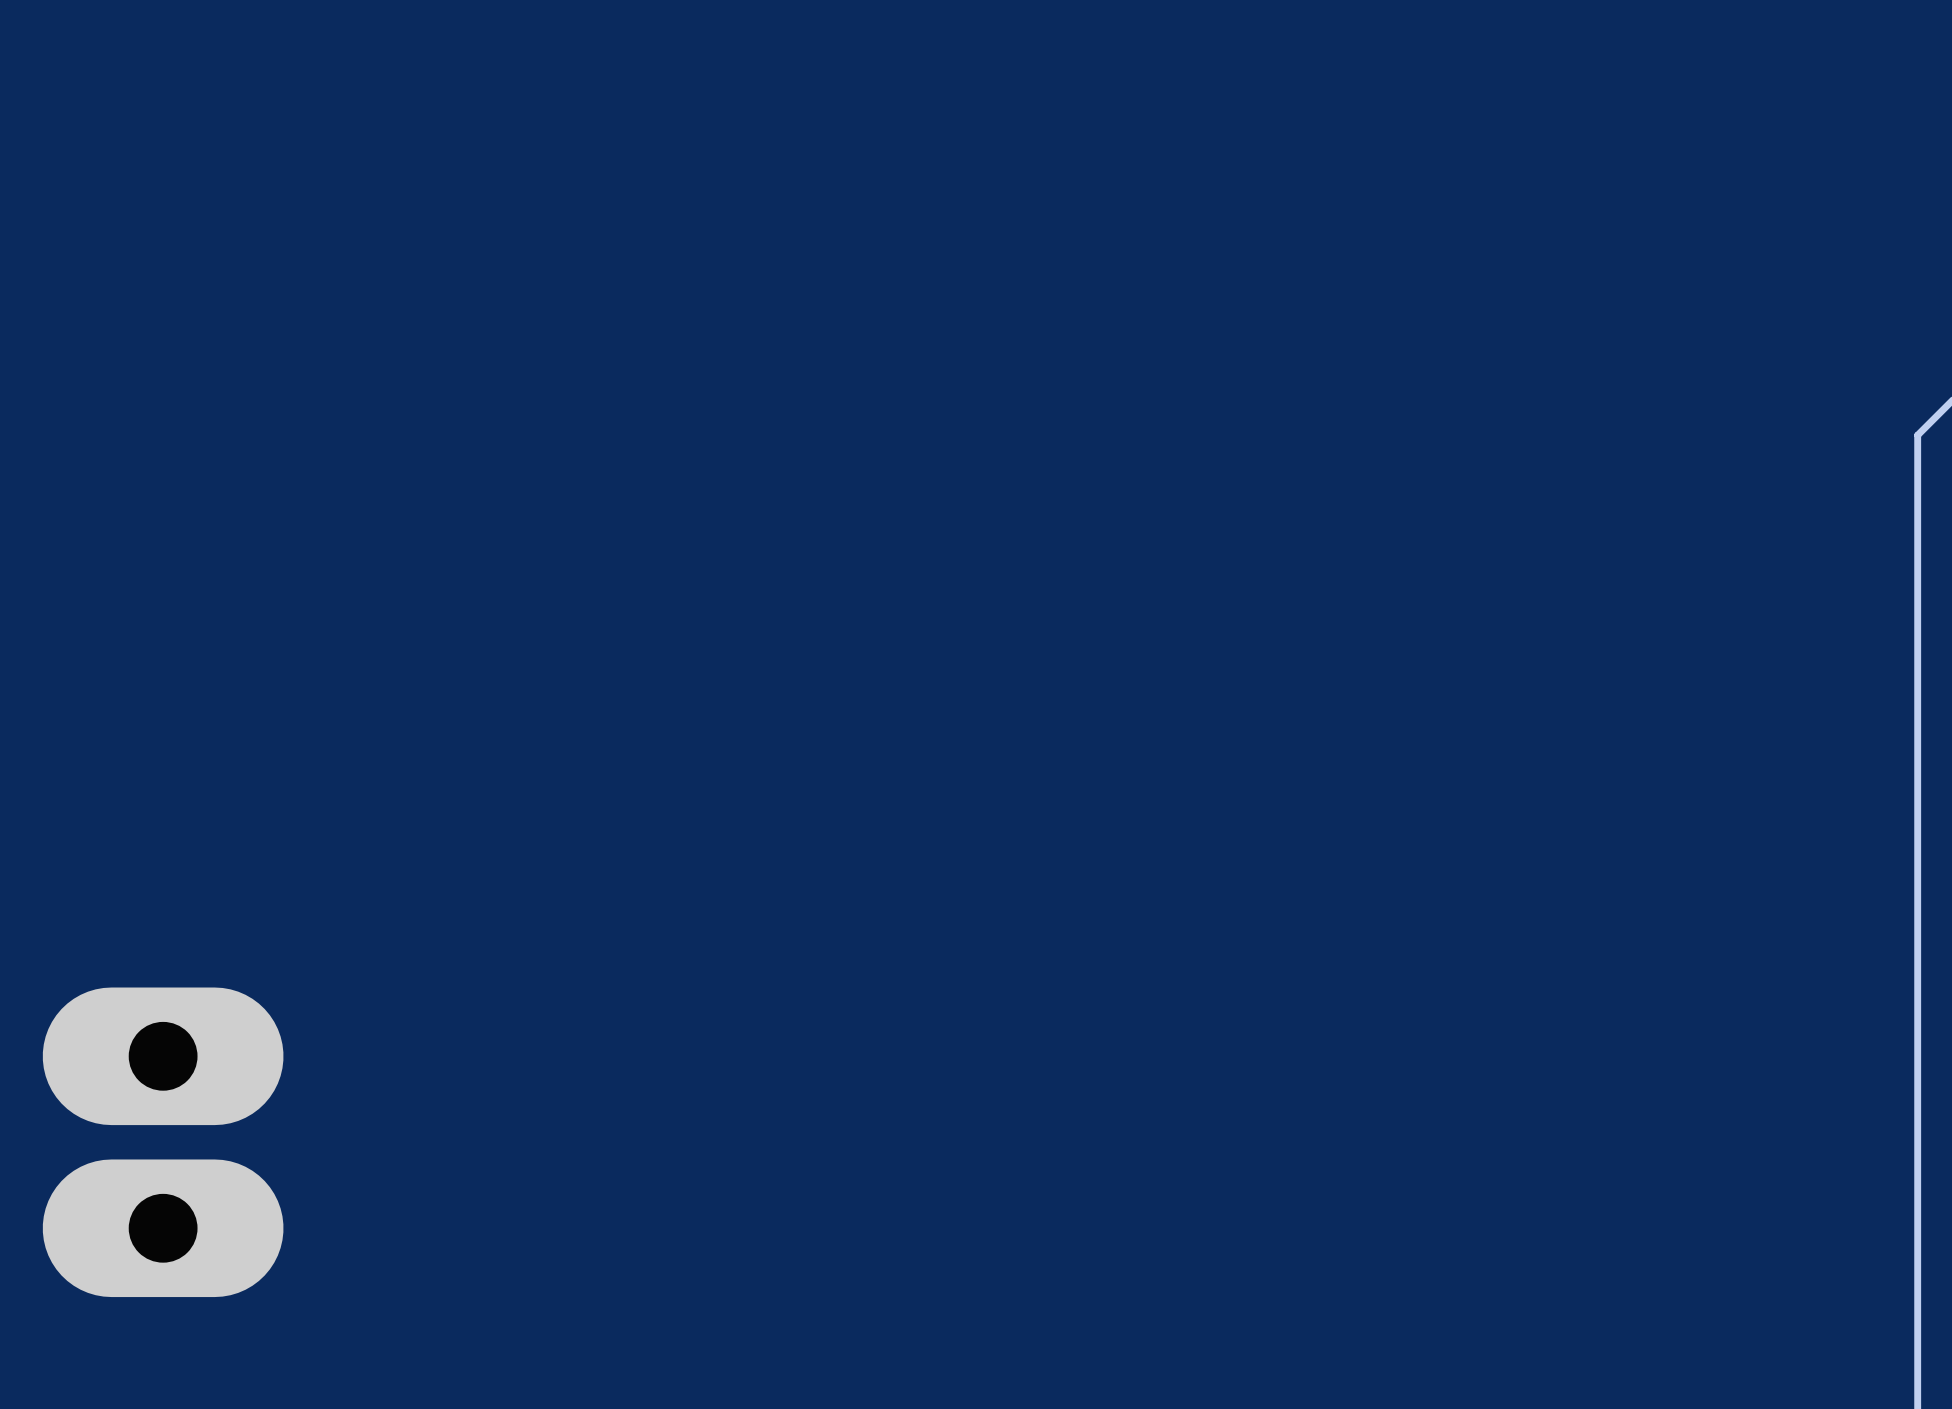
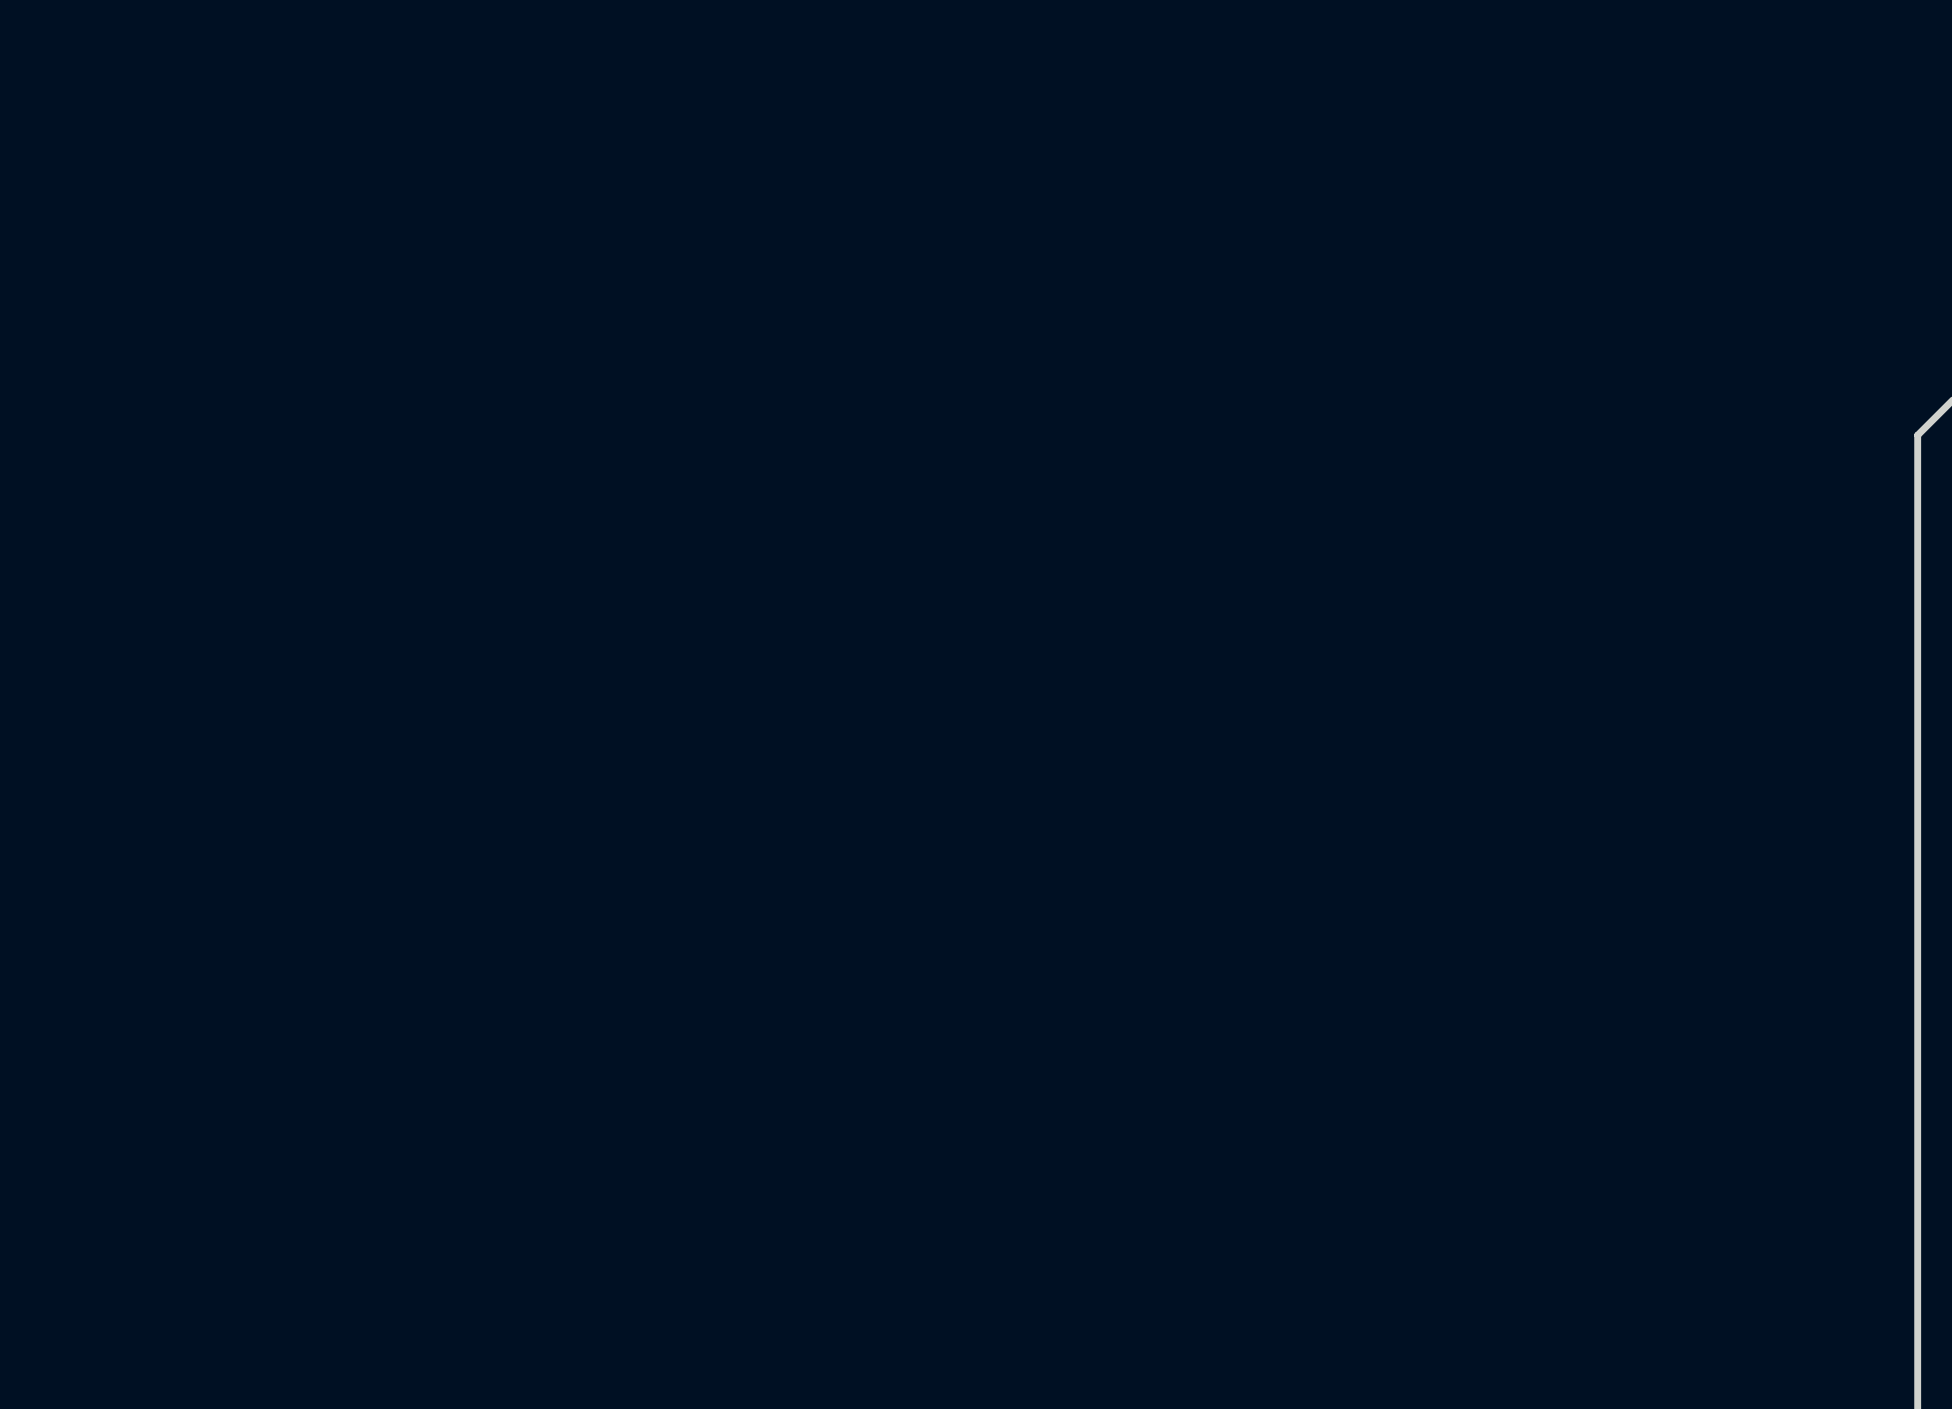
part: (163, 1142) -> none

